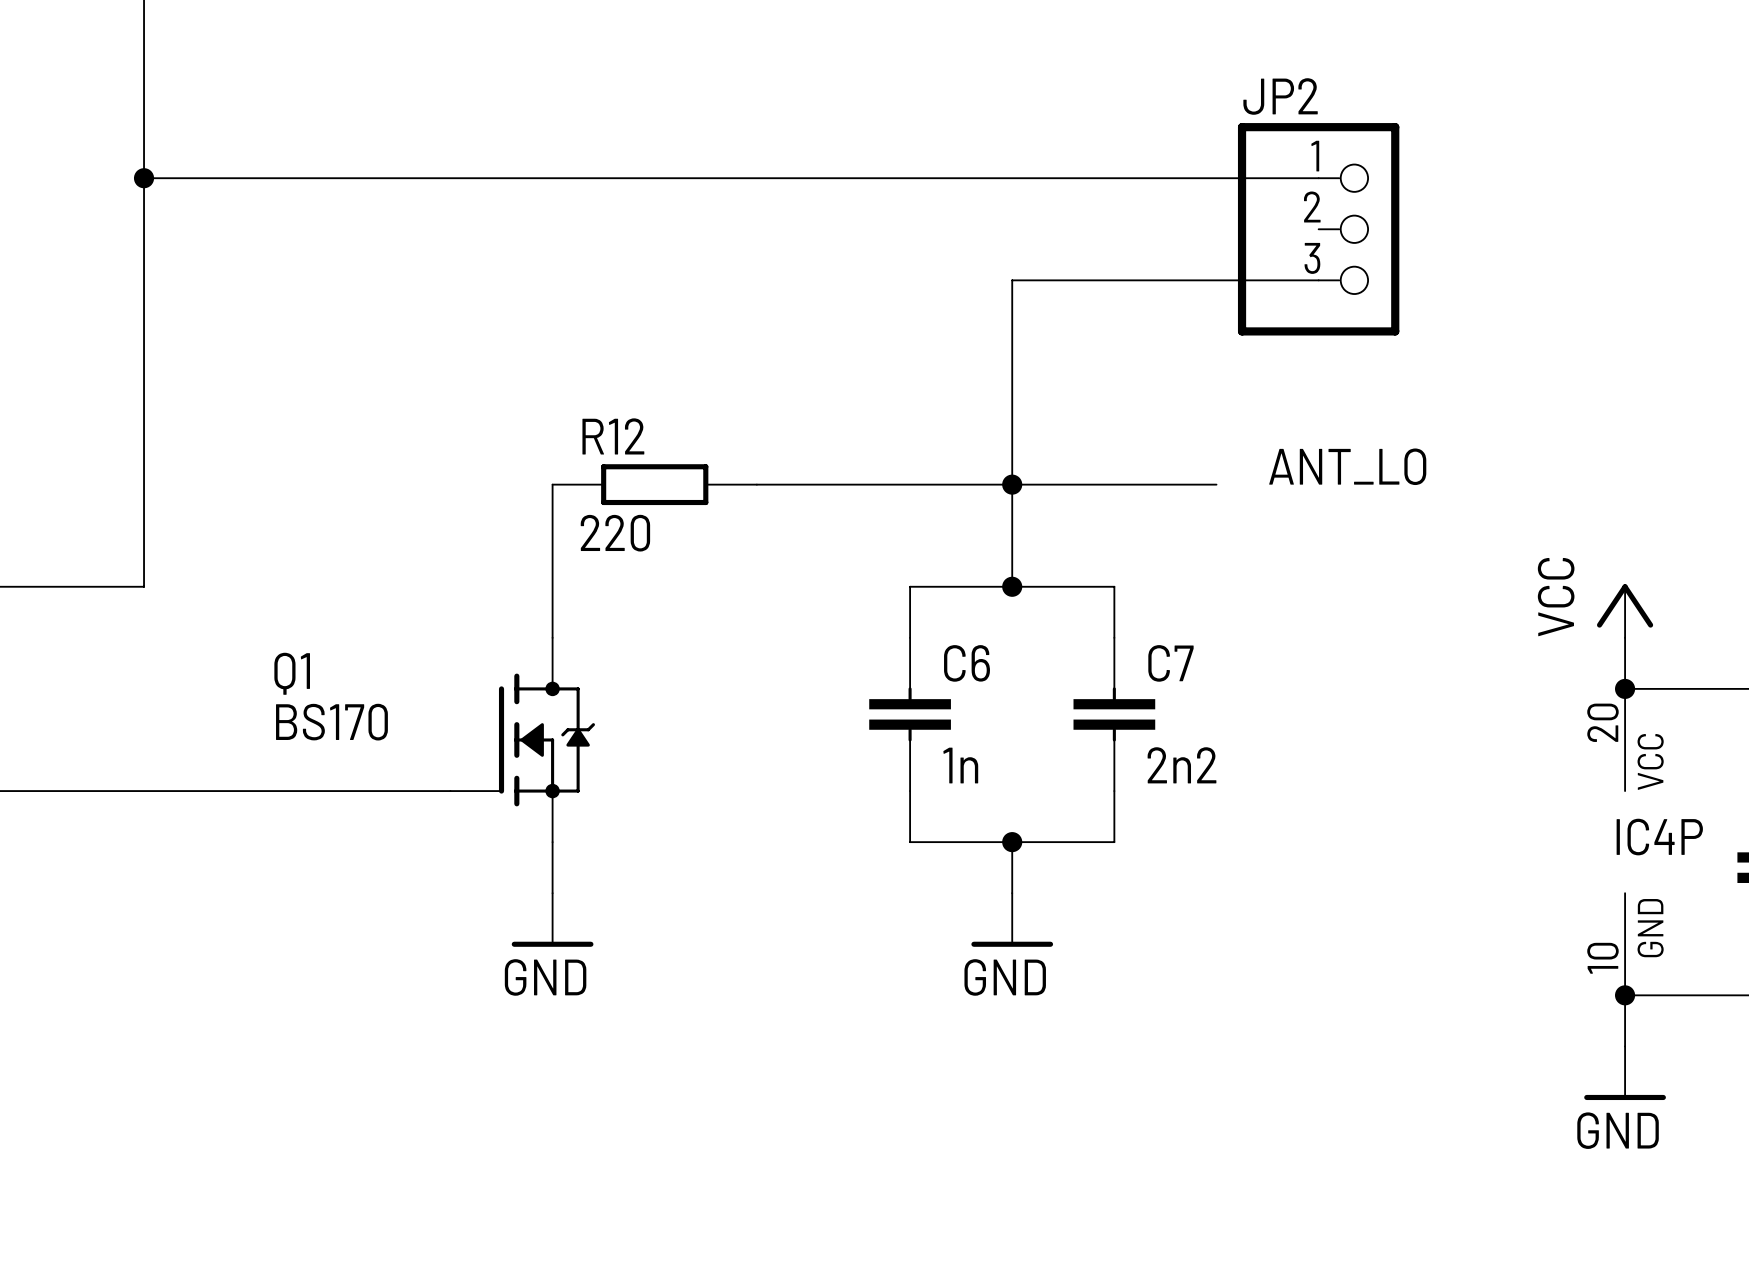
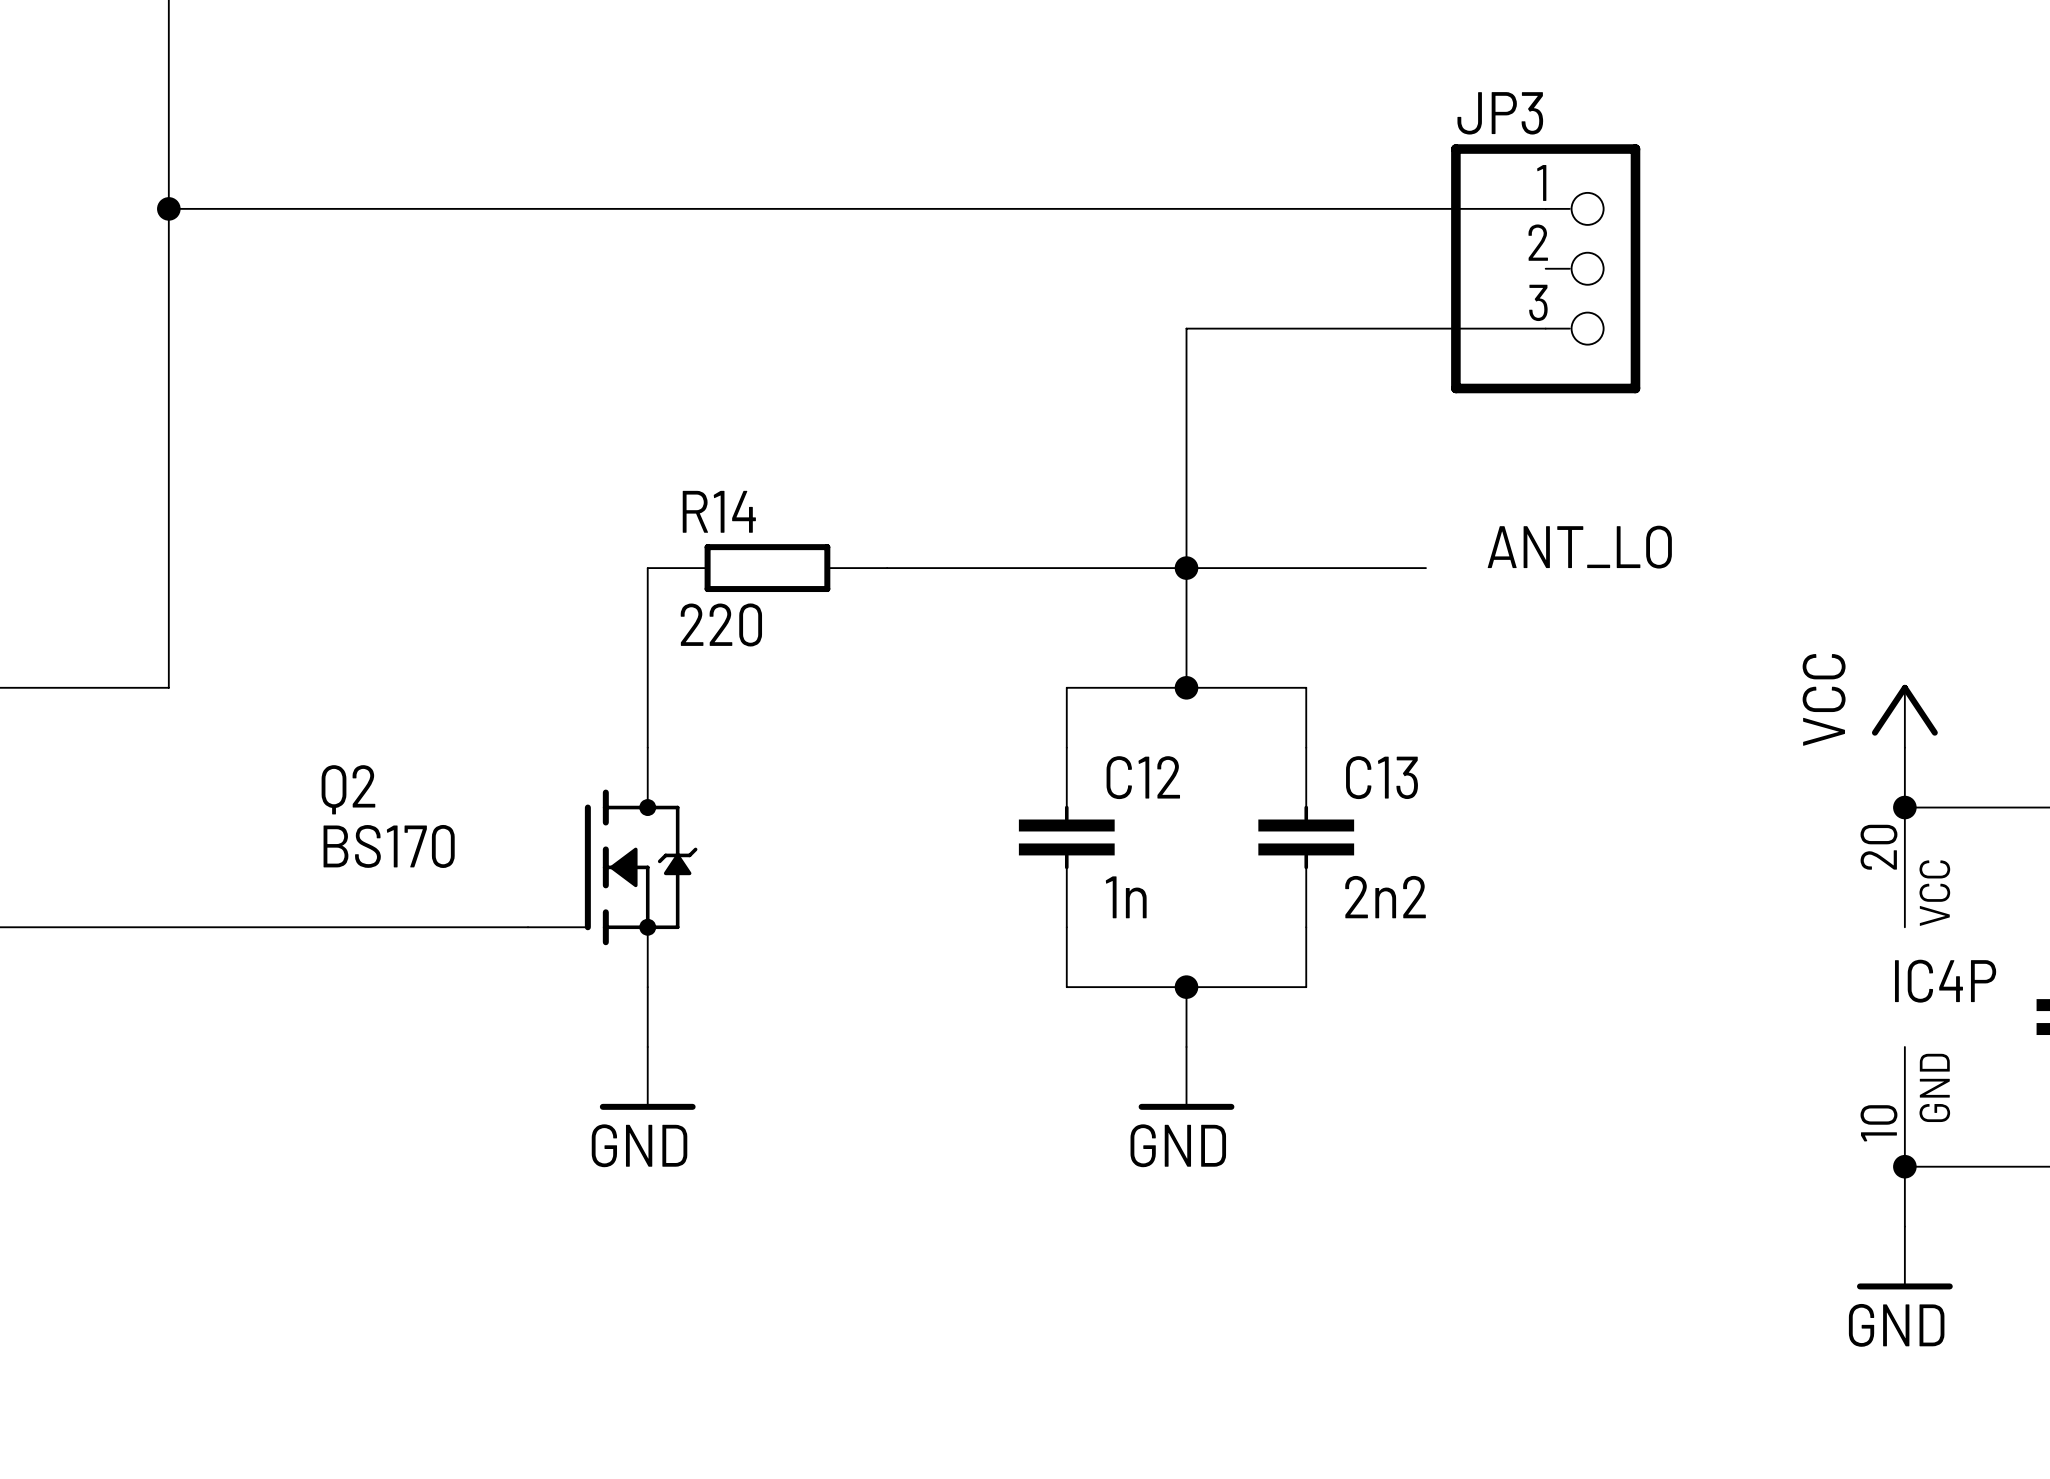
JP2 name: JP2 (1280, 96) -> JP3 (1500, 113)
R12 name: R12 (613, 436) -> R14 (719, 511)
C6 name: C6 (967, 663) -> C12 (1143, 777)
C7 name: C7 (1170, 663) -> C13 (1382, 777)
Q1 name: Q1 (292, 673) -> Q2 (348, 789)

